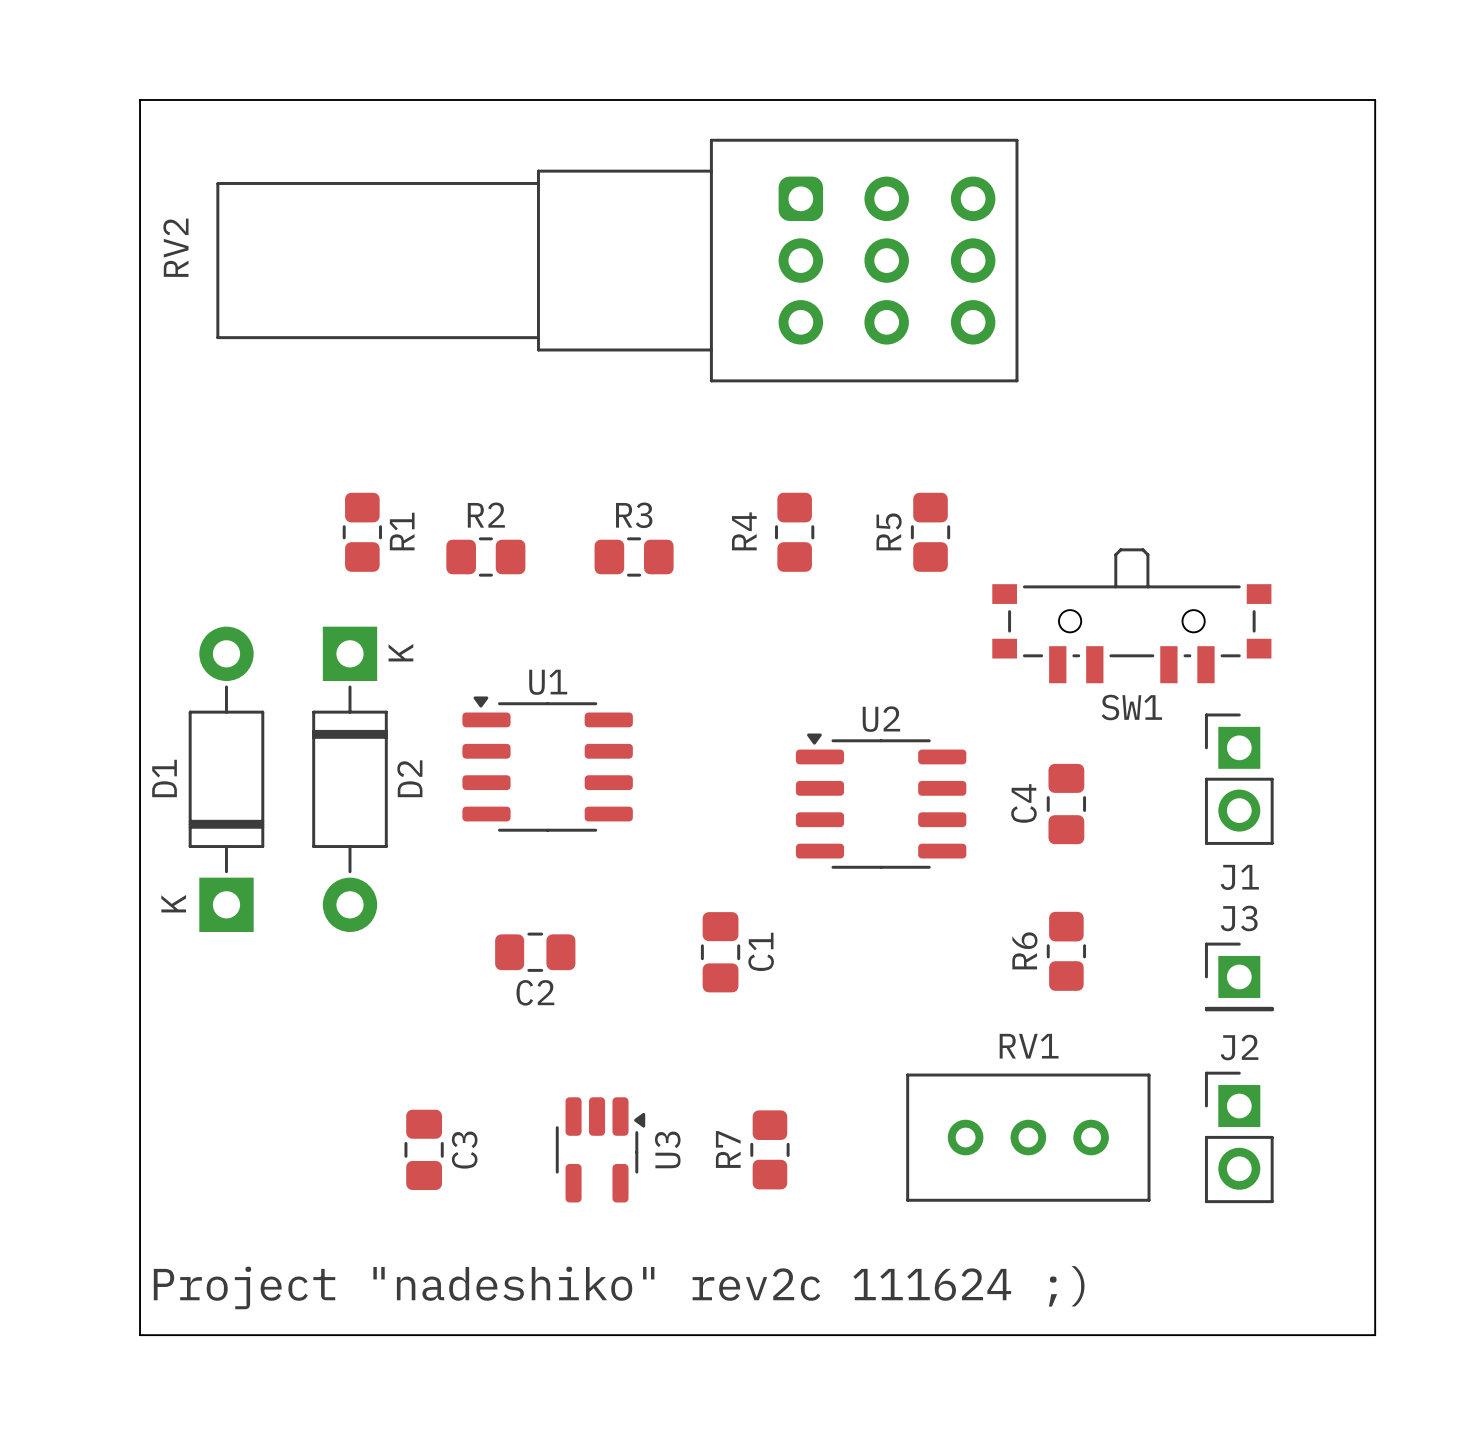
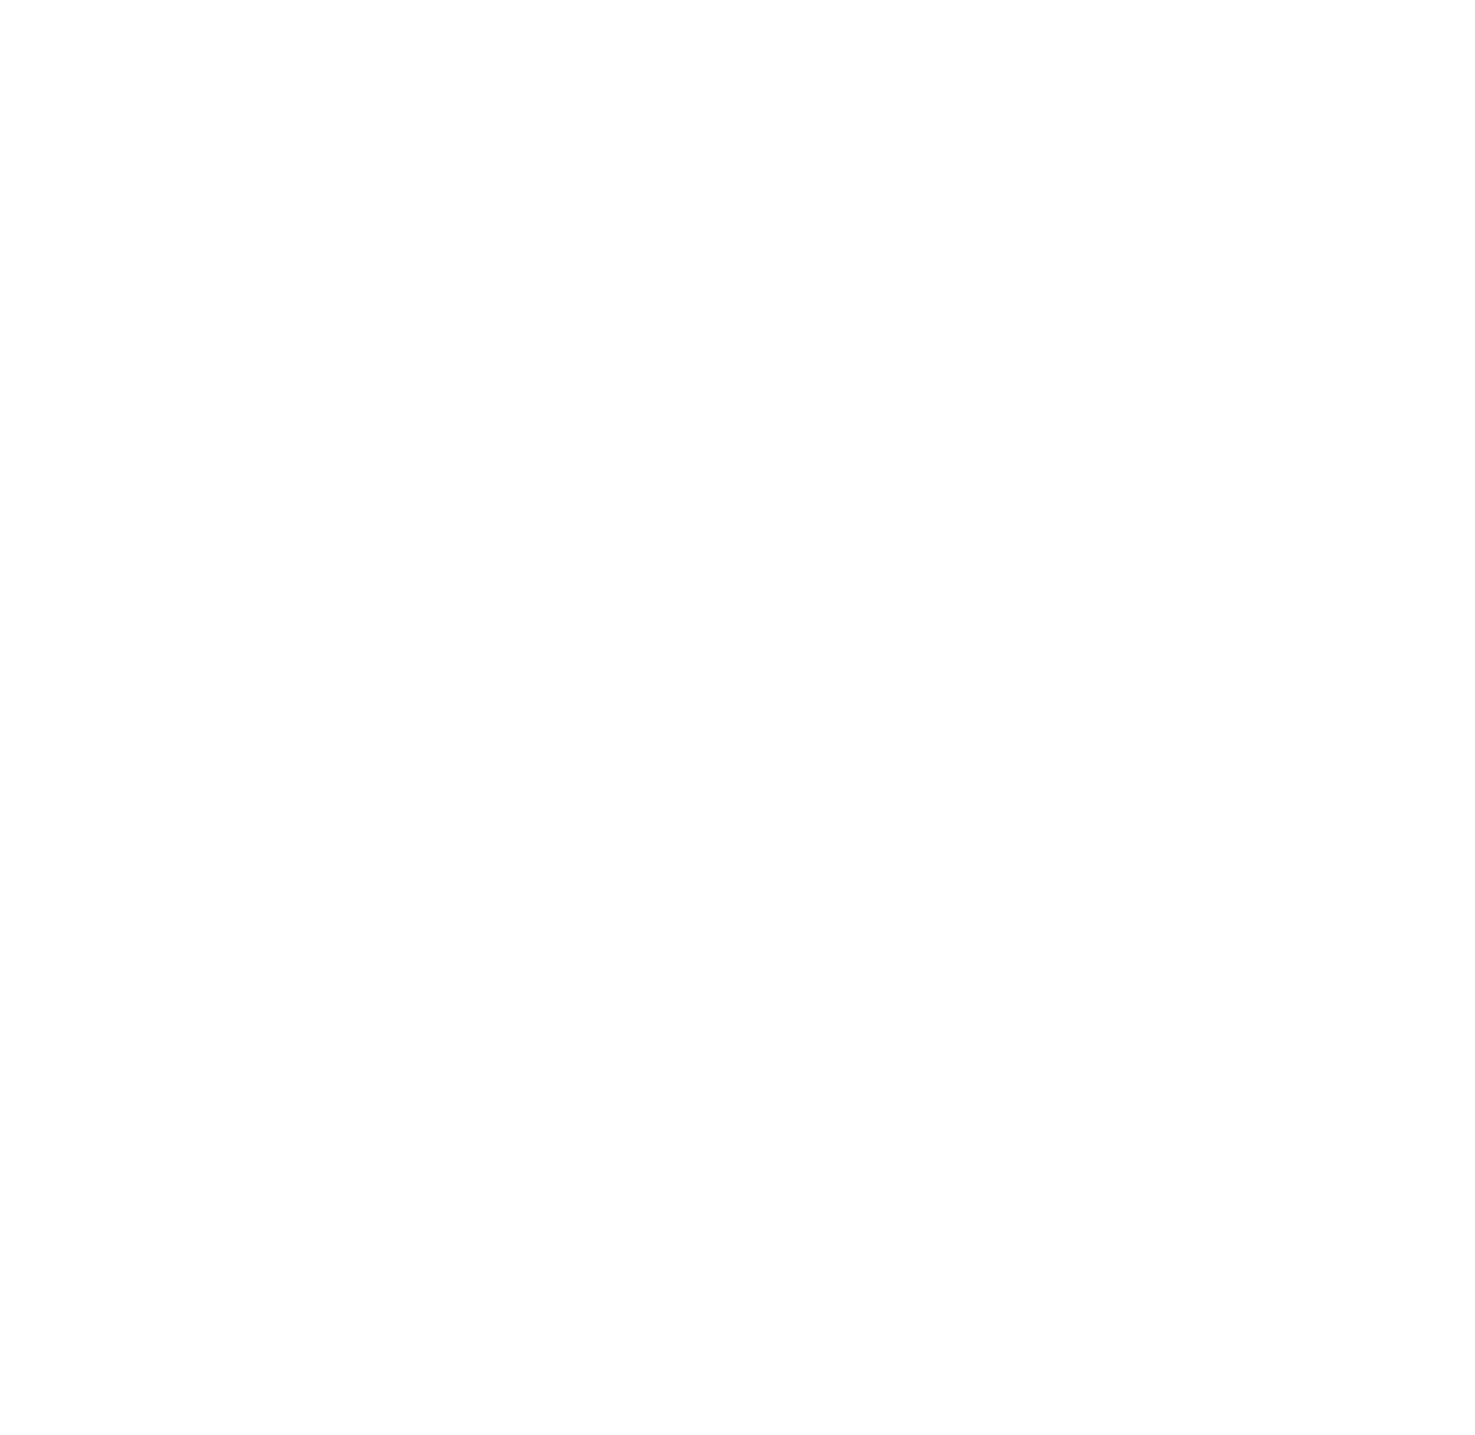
board edge: (140, 99) (1375, 99) (1375, 1335) (140, 1335) (140, 99) -> none
RV2: (617, 260) -> none
R1: (362, 532) -> none
R4: (794, 532) -> none
R5: (930, 532) -> none
R2: (485, 557) -> none
R3: (634, 557) -> none
SW1: (1131, 615) -> none
U1: (547, 764) -> none
D1: (226, 779) -> none
D2: (350, 779) -> none
J1: (1239, 779) -> none
U2: (881, 801) -> none
C4: (1066, 804) -> none
R6: (1066, 951) -> none
C2: (535, 952) -> none
C1: (720, 952) -> none
J3: (1239, 976) -> none
RV1: (1028, 1137) -> none
J2: (1239, 1137) -> none
C3: (424, 1149) -> none
U3: (600, 1149) -> none
R7: (769, 1149) -> none
text: Project "nadeshiko" rev2c 111624 ;) (619, 1287) -> none

